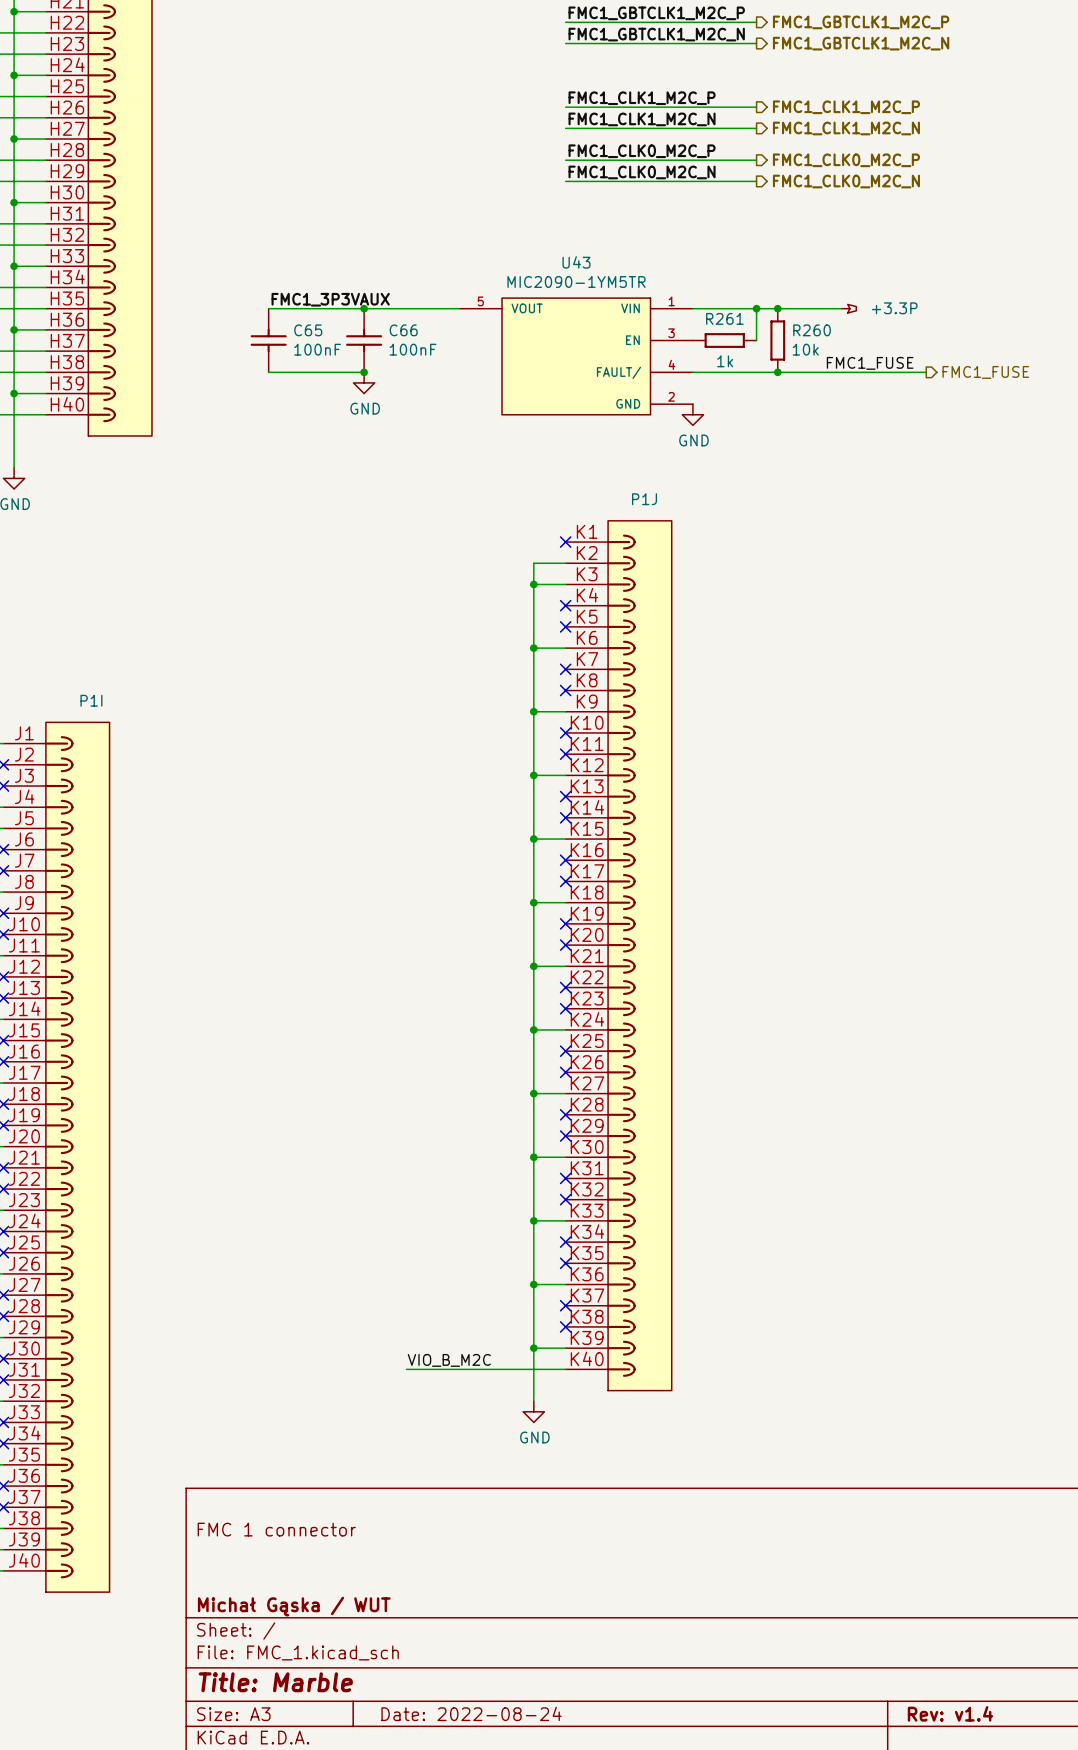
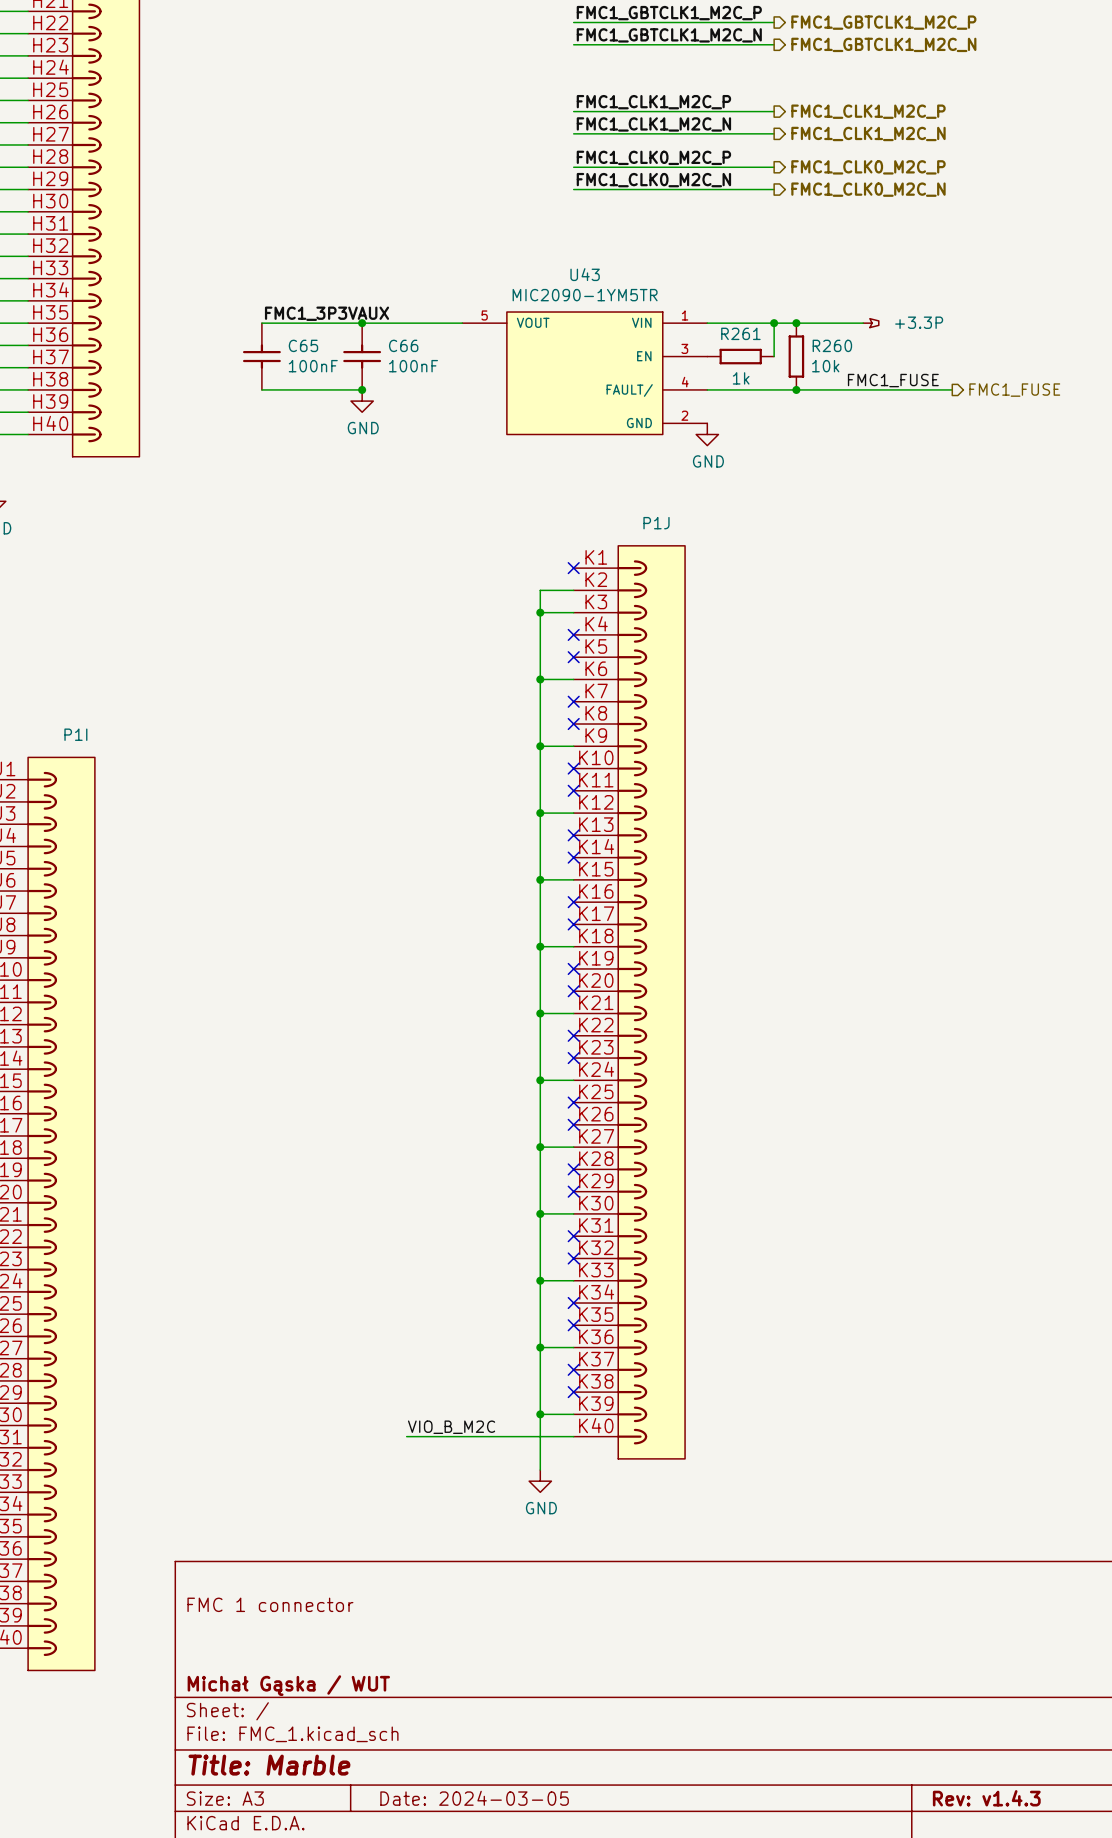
title block: Date: 2022-08-24 (471, 1713) -> Date: 2024-03-05 (474, 1798)
title block: Rev: v1.4 (950, 1713) -> Rev: v1.4.3 (986, 1798)

